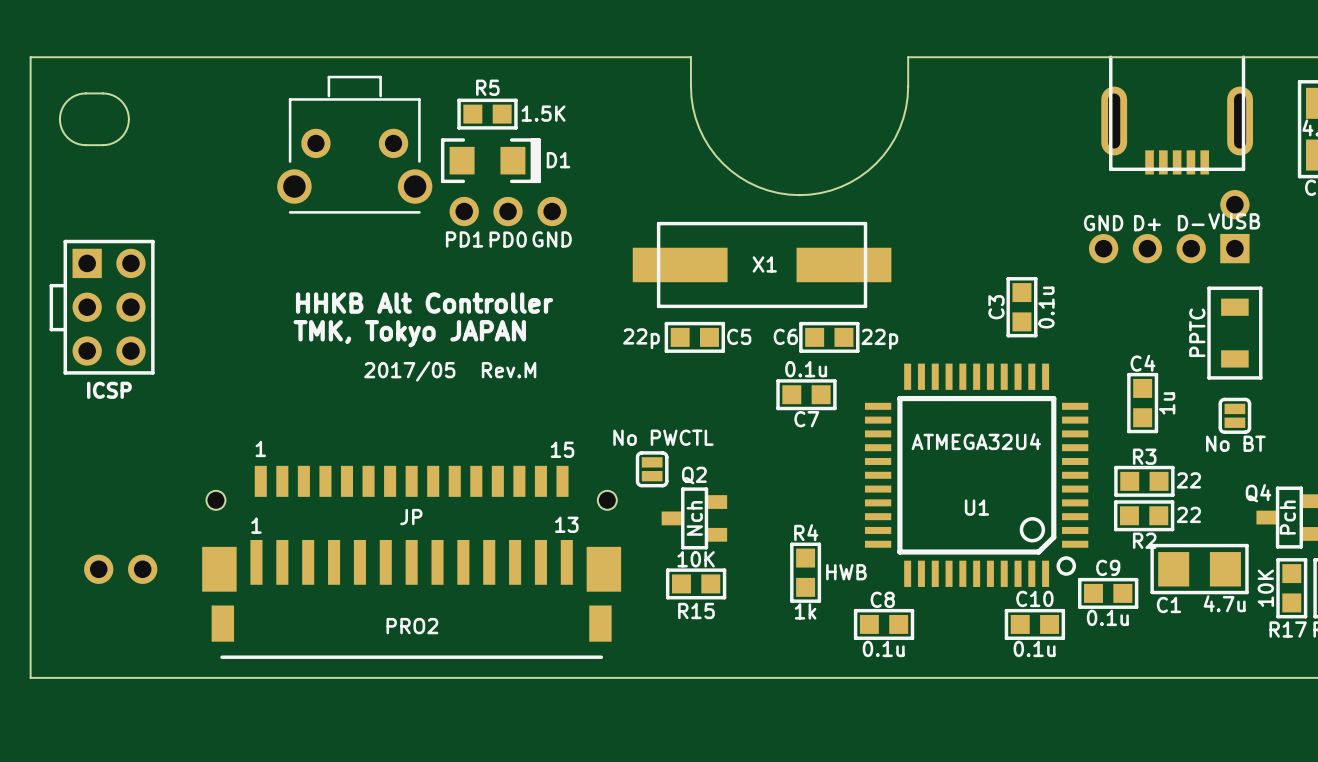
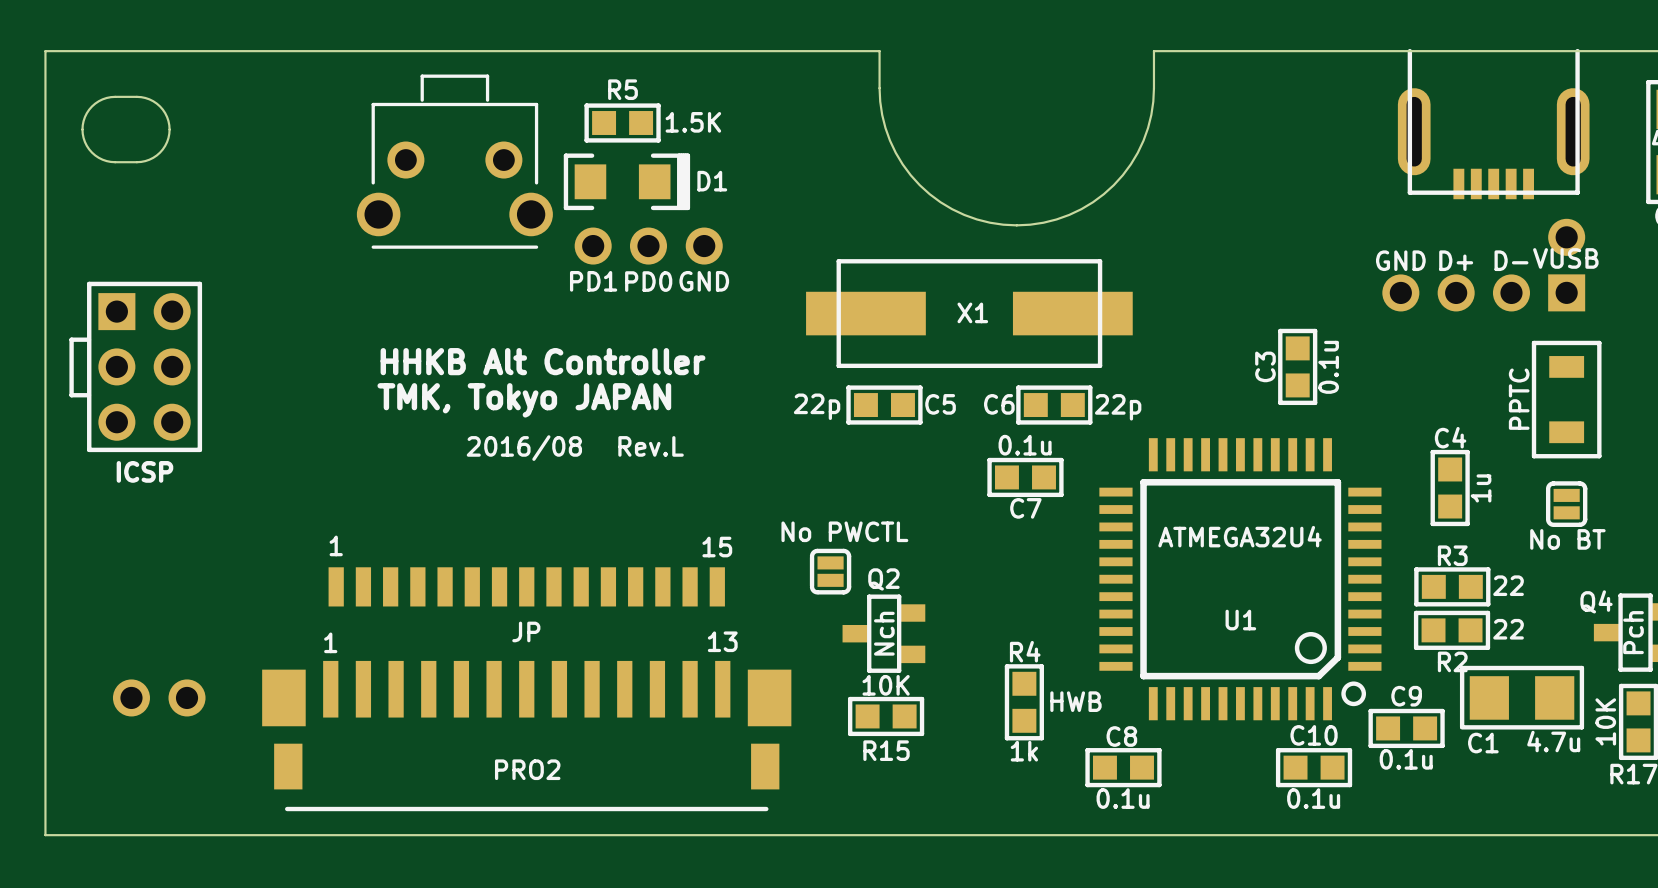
text: Rev.M (509, 370) -> Rev.L (651, 446)
text: 2017/05 (409, 371) -> 2016/08 (524, 448)
part footprint: [202, 465, 622, 592] -> [262, 567, 792, 727]

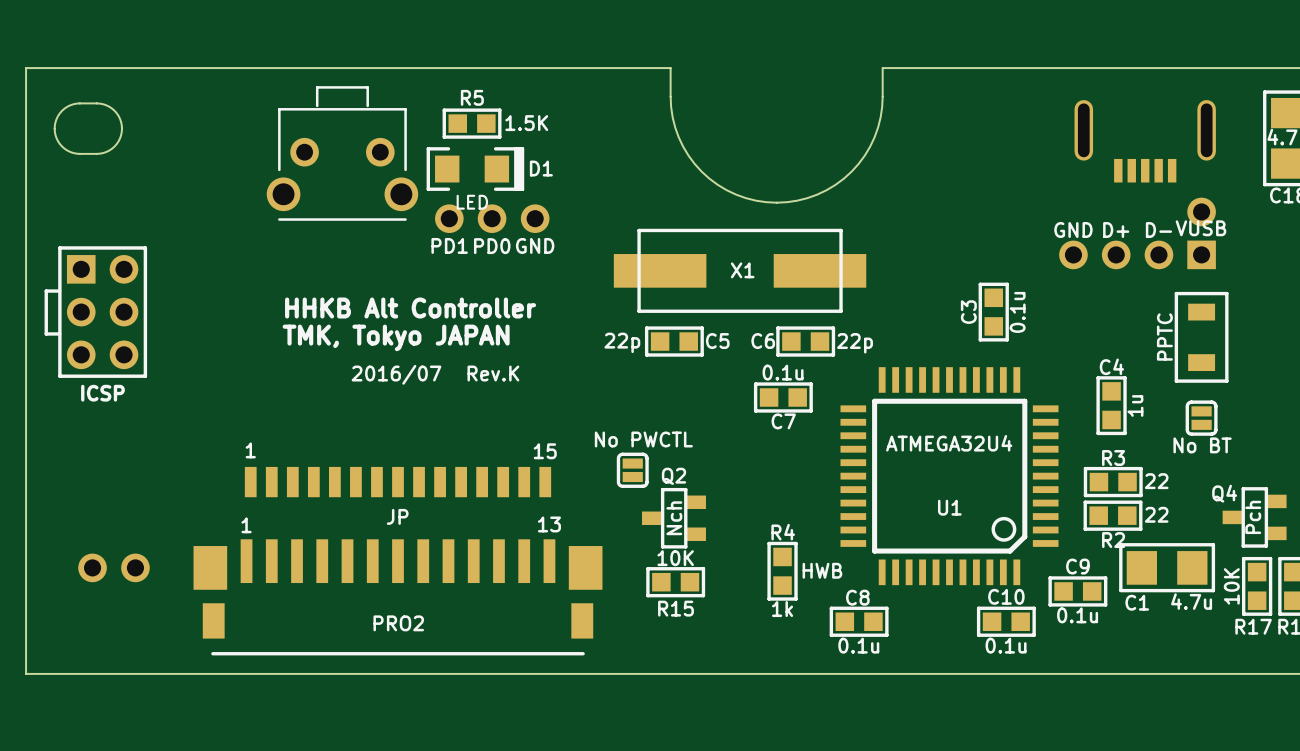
part footprint: [1397, 48, 1590, 200] -> [1074, 100, 1216, 183]
D1 value: none -> LED (472, 202)
text: Rev.L (651, 446) -> Rev.K (493, 373)
text: 2016/08 (524, 448) -> 2016/07 (396, 374)
drawing: [1341, 681, 1367, 707] -> none

